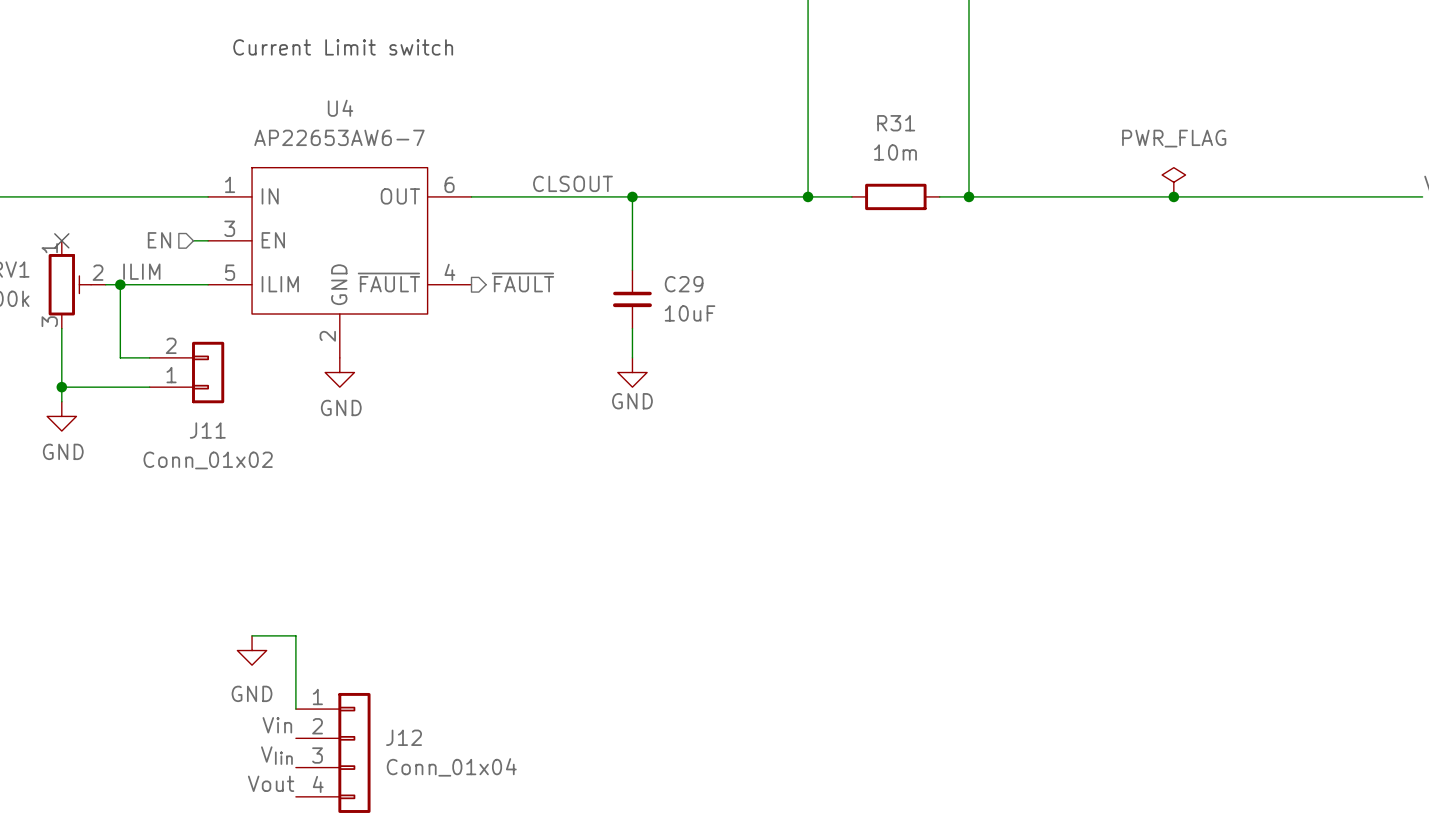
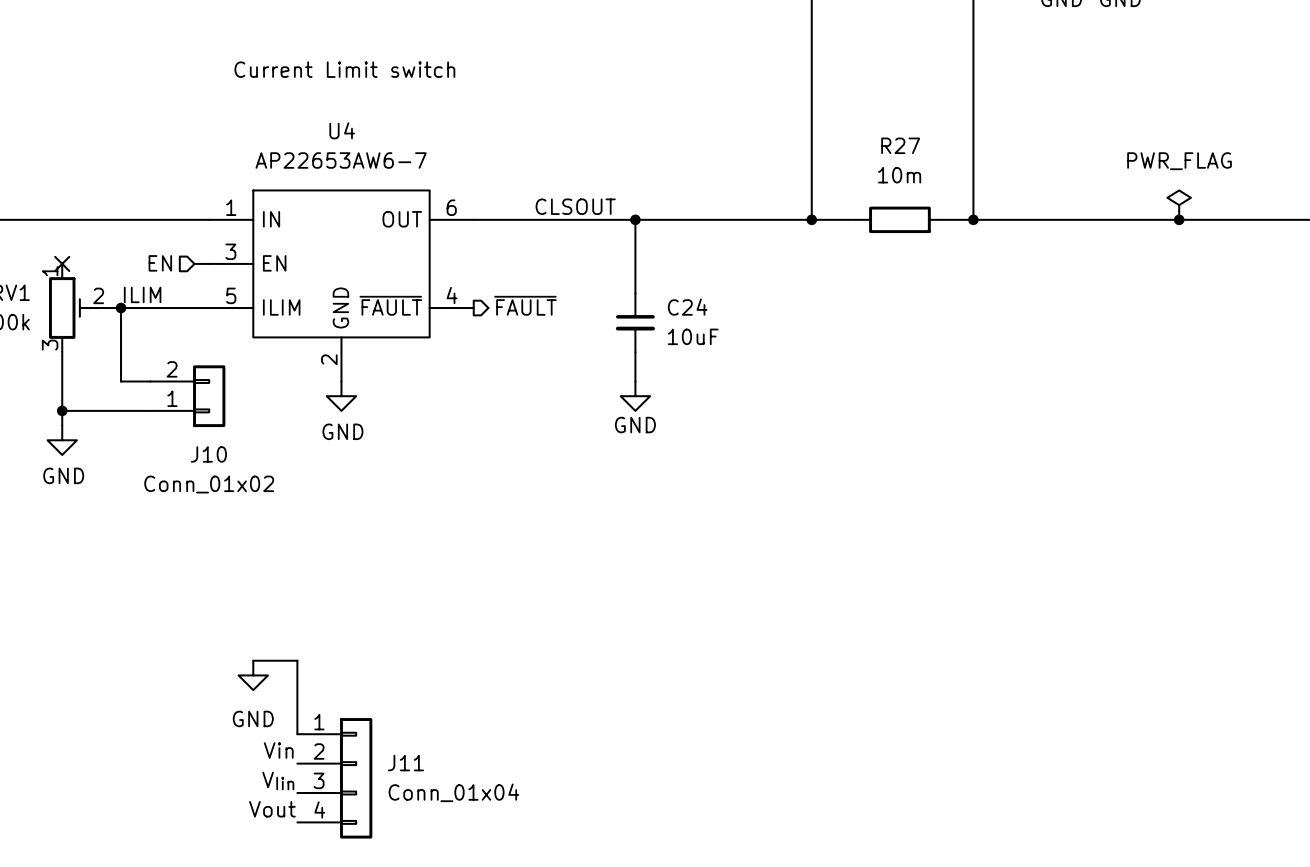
R31 name: R31 (896, 123) -> R27 (900, 145)
C29 name: C29 (684, 284) -> C24 (687, 307)
J11 name: J11 (207, 430) -> J10 (208, 454)
J12 name: J12 (404, 737) -> J11 (405, 763)

